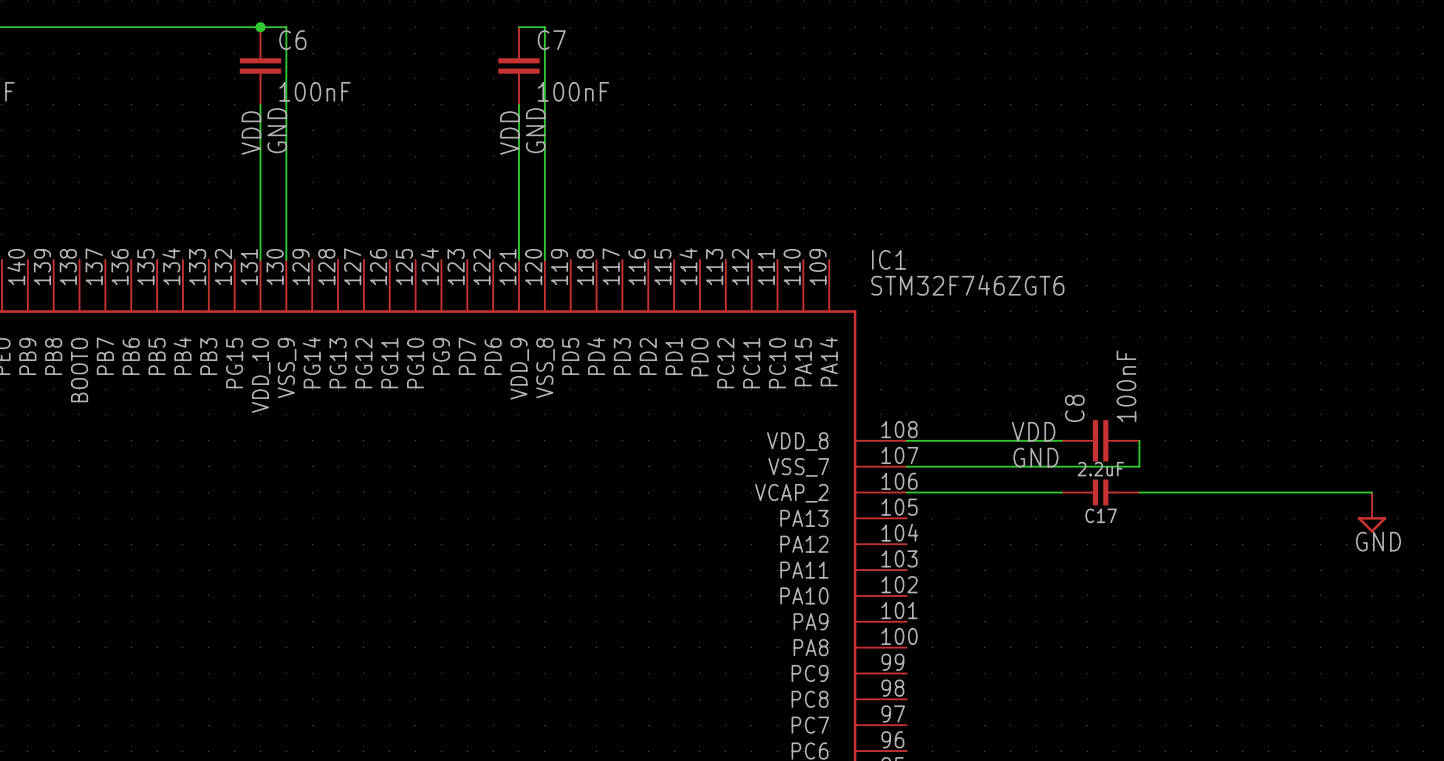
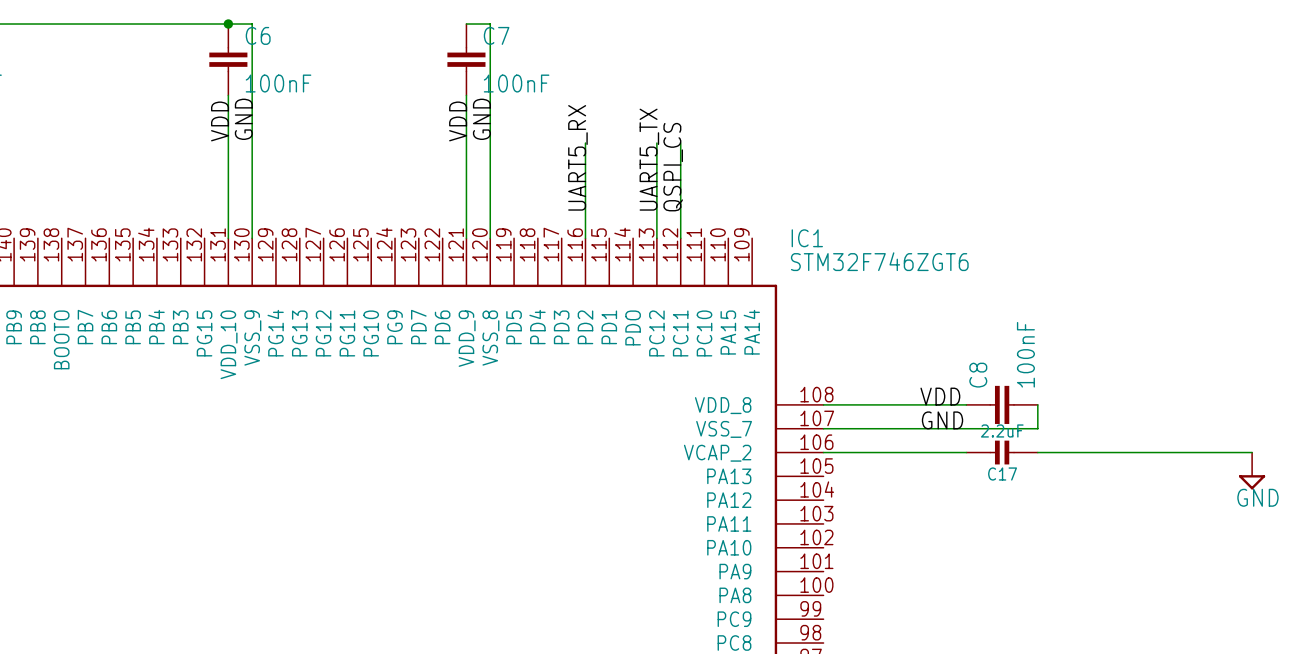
wire: none -> (585, 143) (585, 238)
wire: none -> (656, 143) (656, 238)
wire: none -> (680, 143) (680, 238)
label: none -> UART5_RX (577, 157)
label: none -> UART5_TX (649, 159)
label: none -> QSPI_CS (673, 167)

